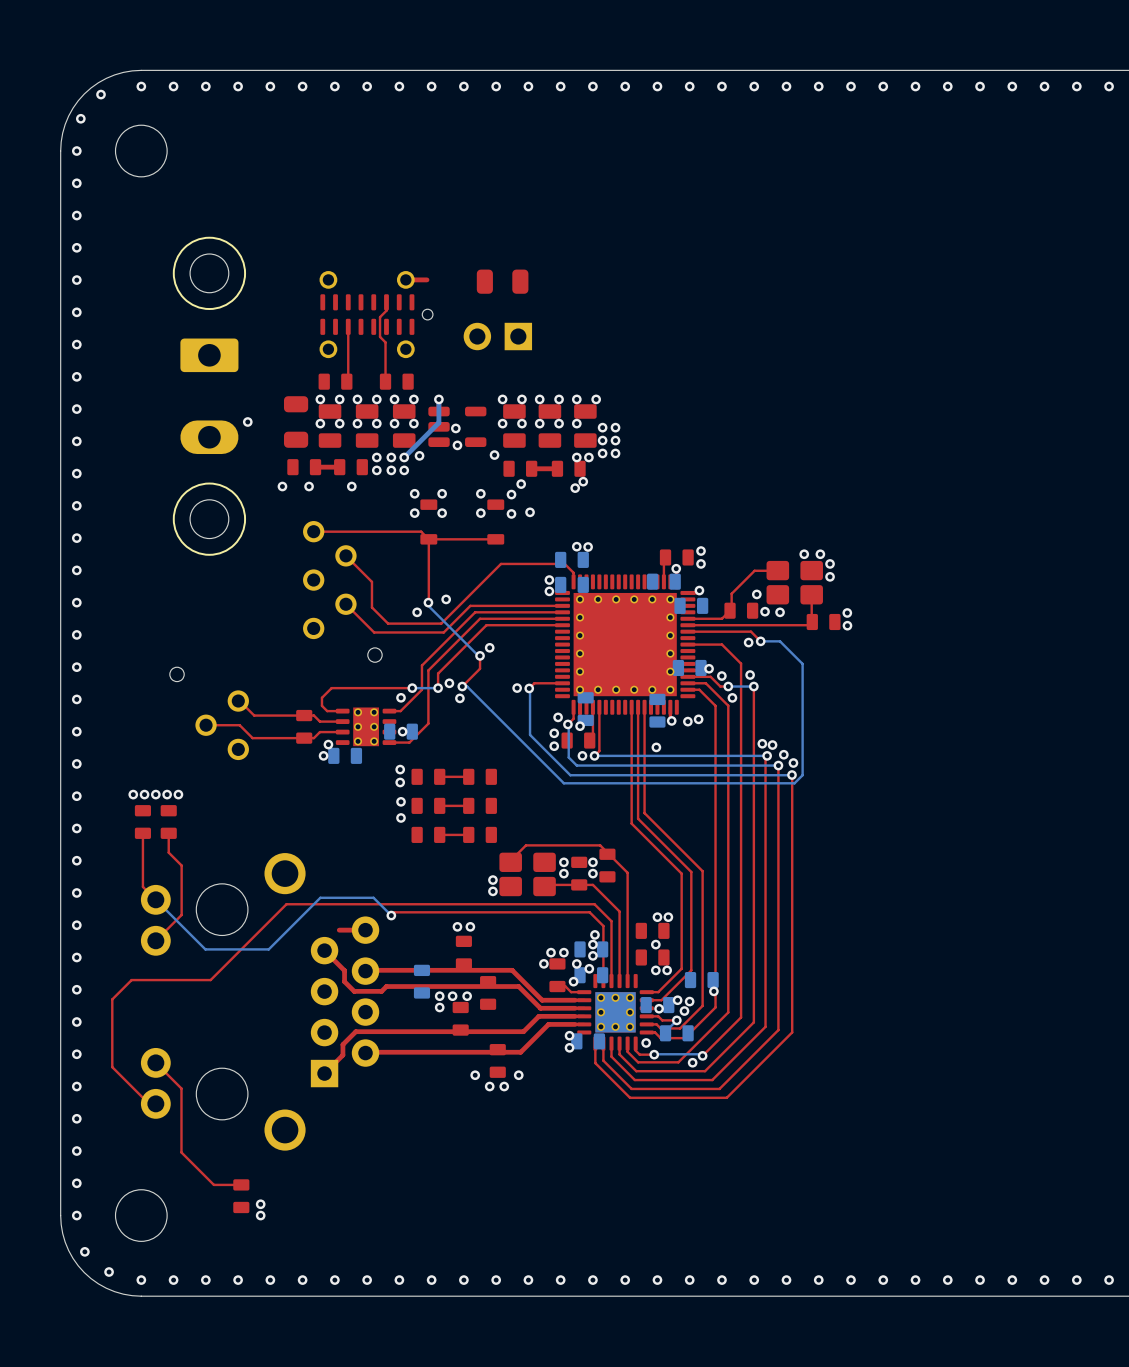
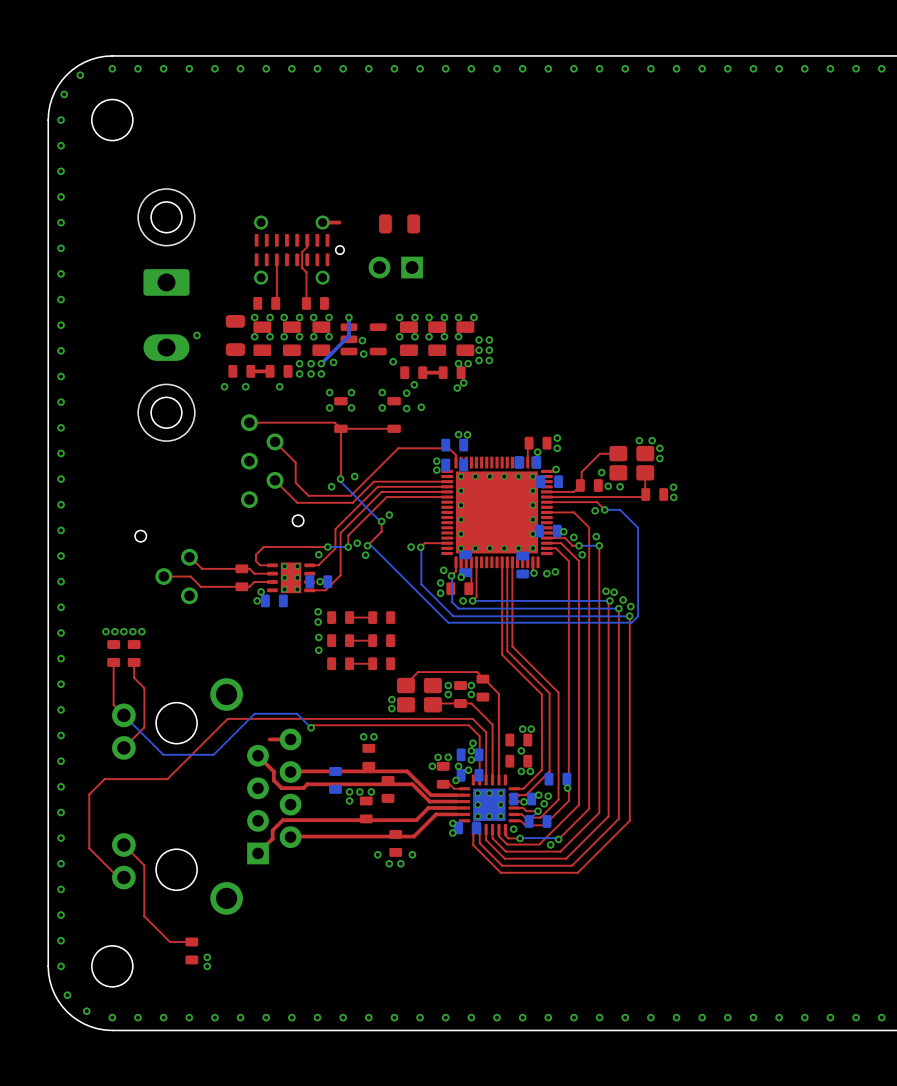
via: (656, 747) -> none

